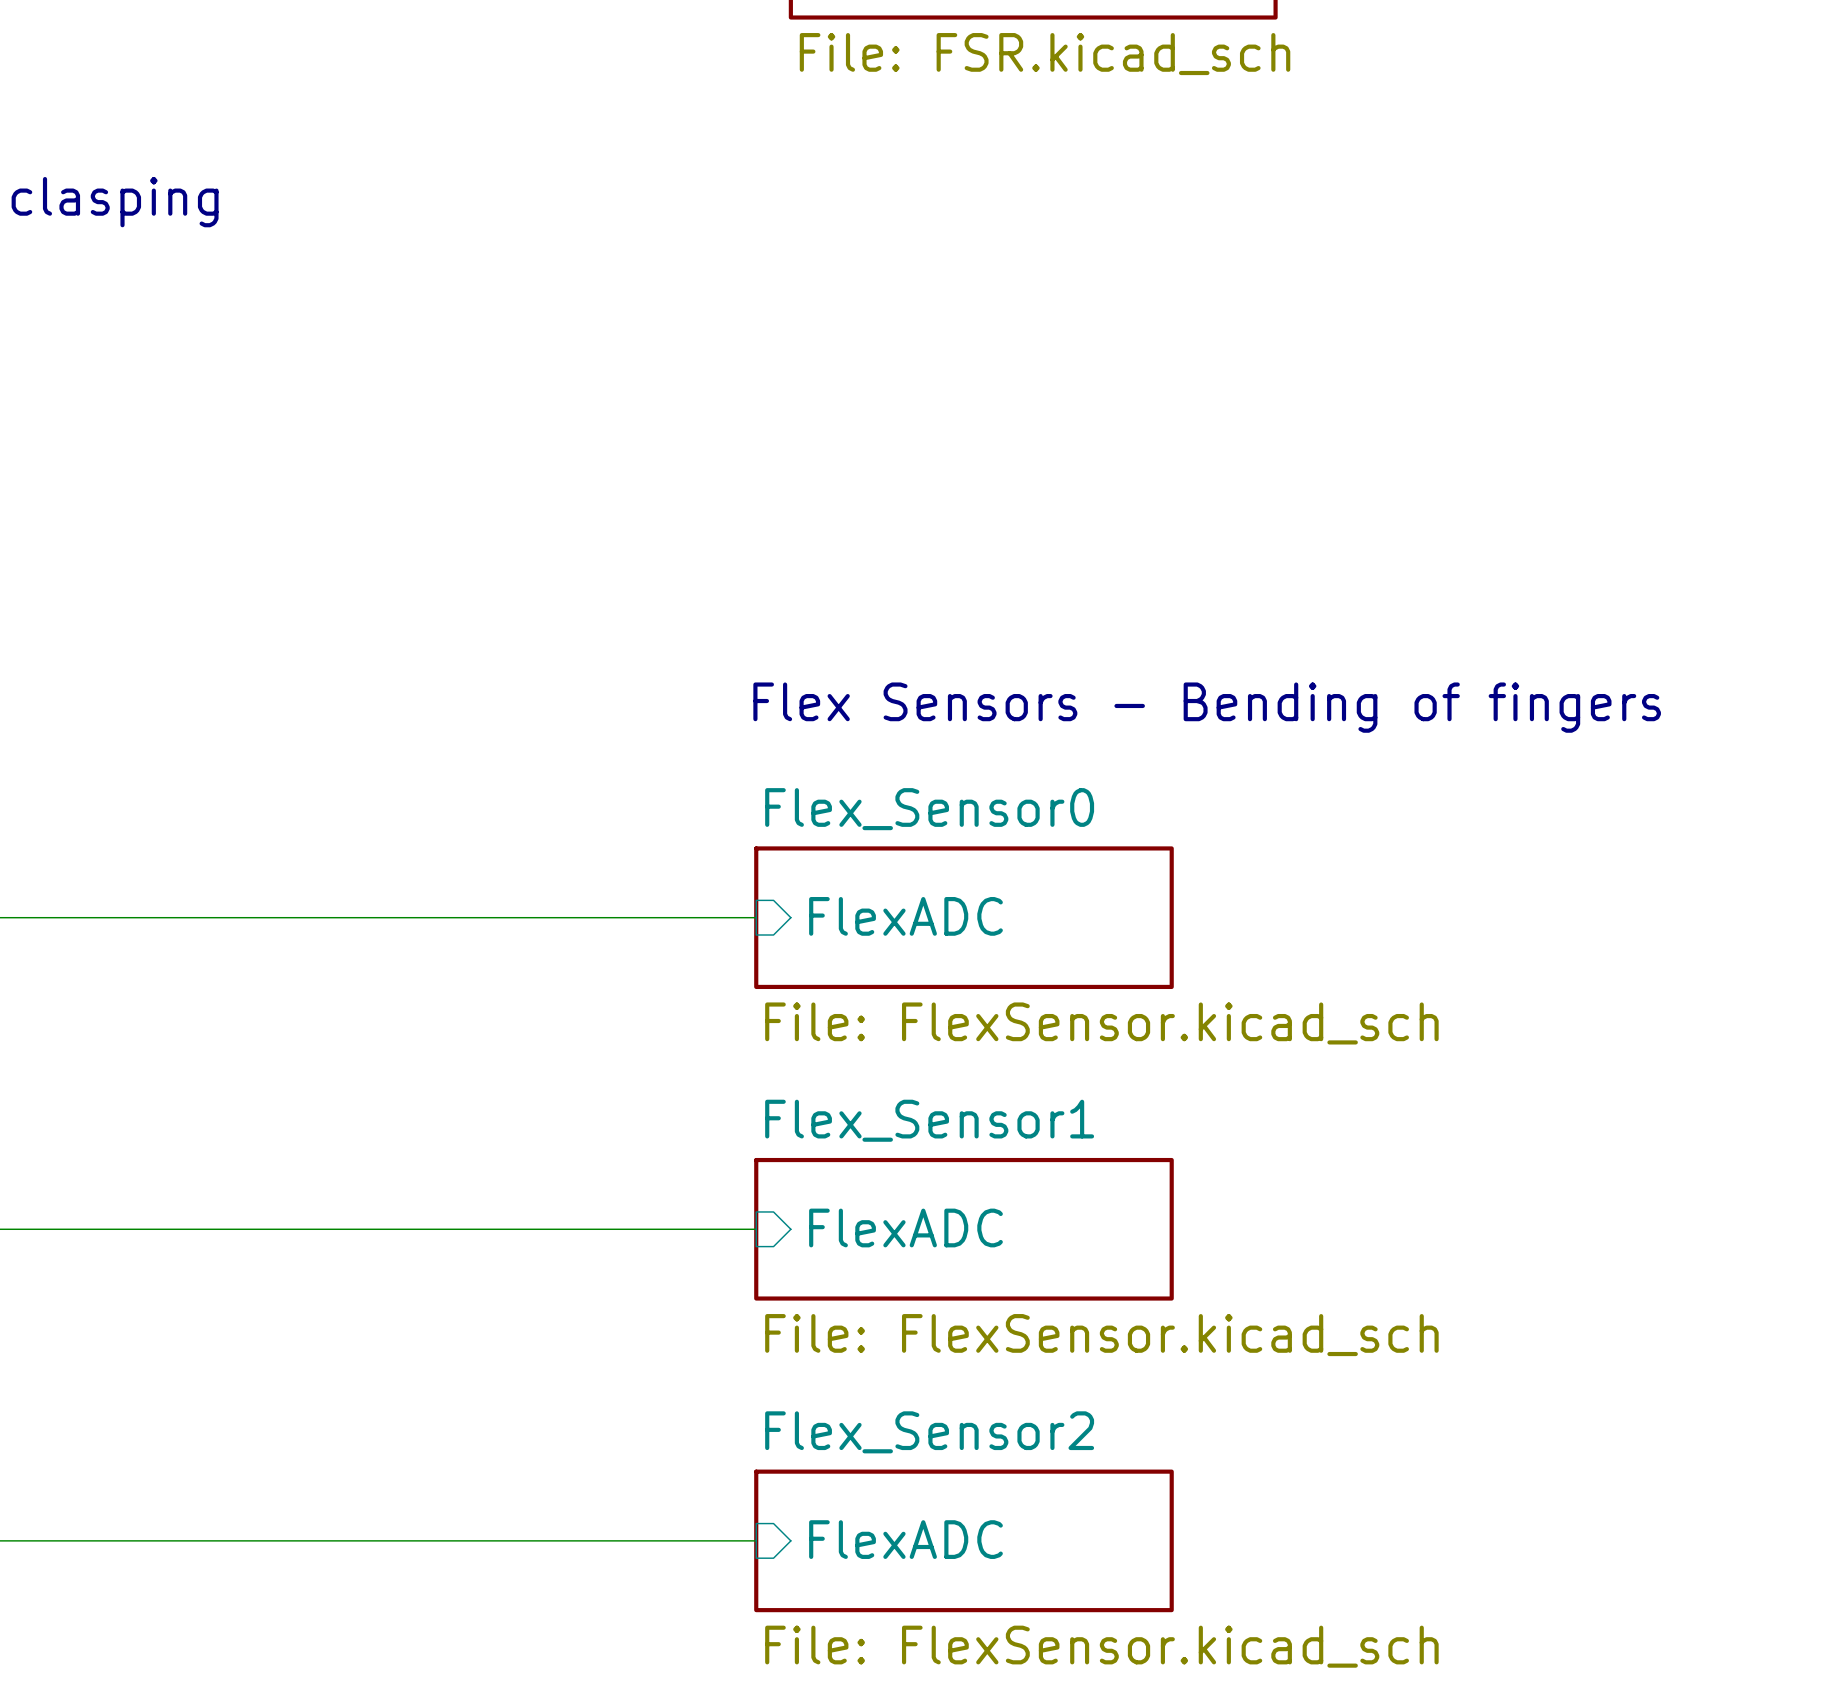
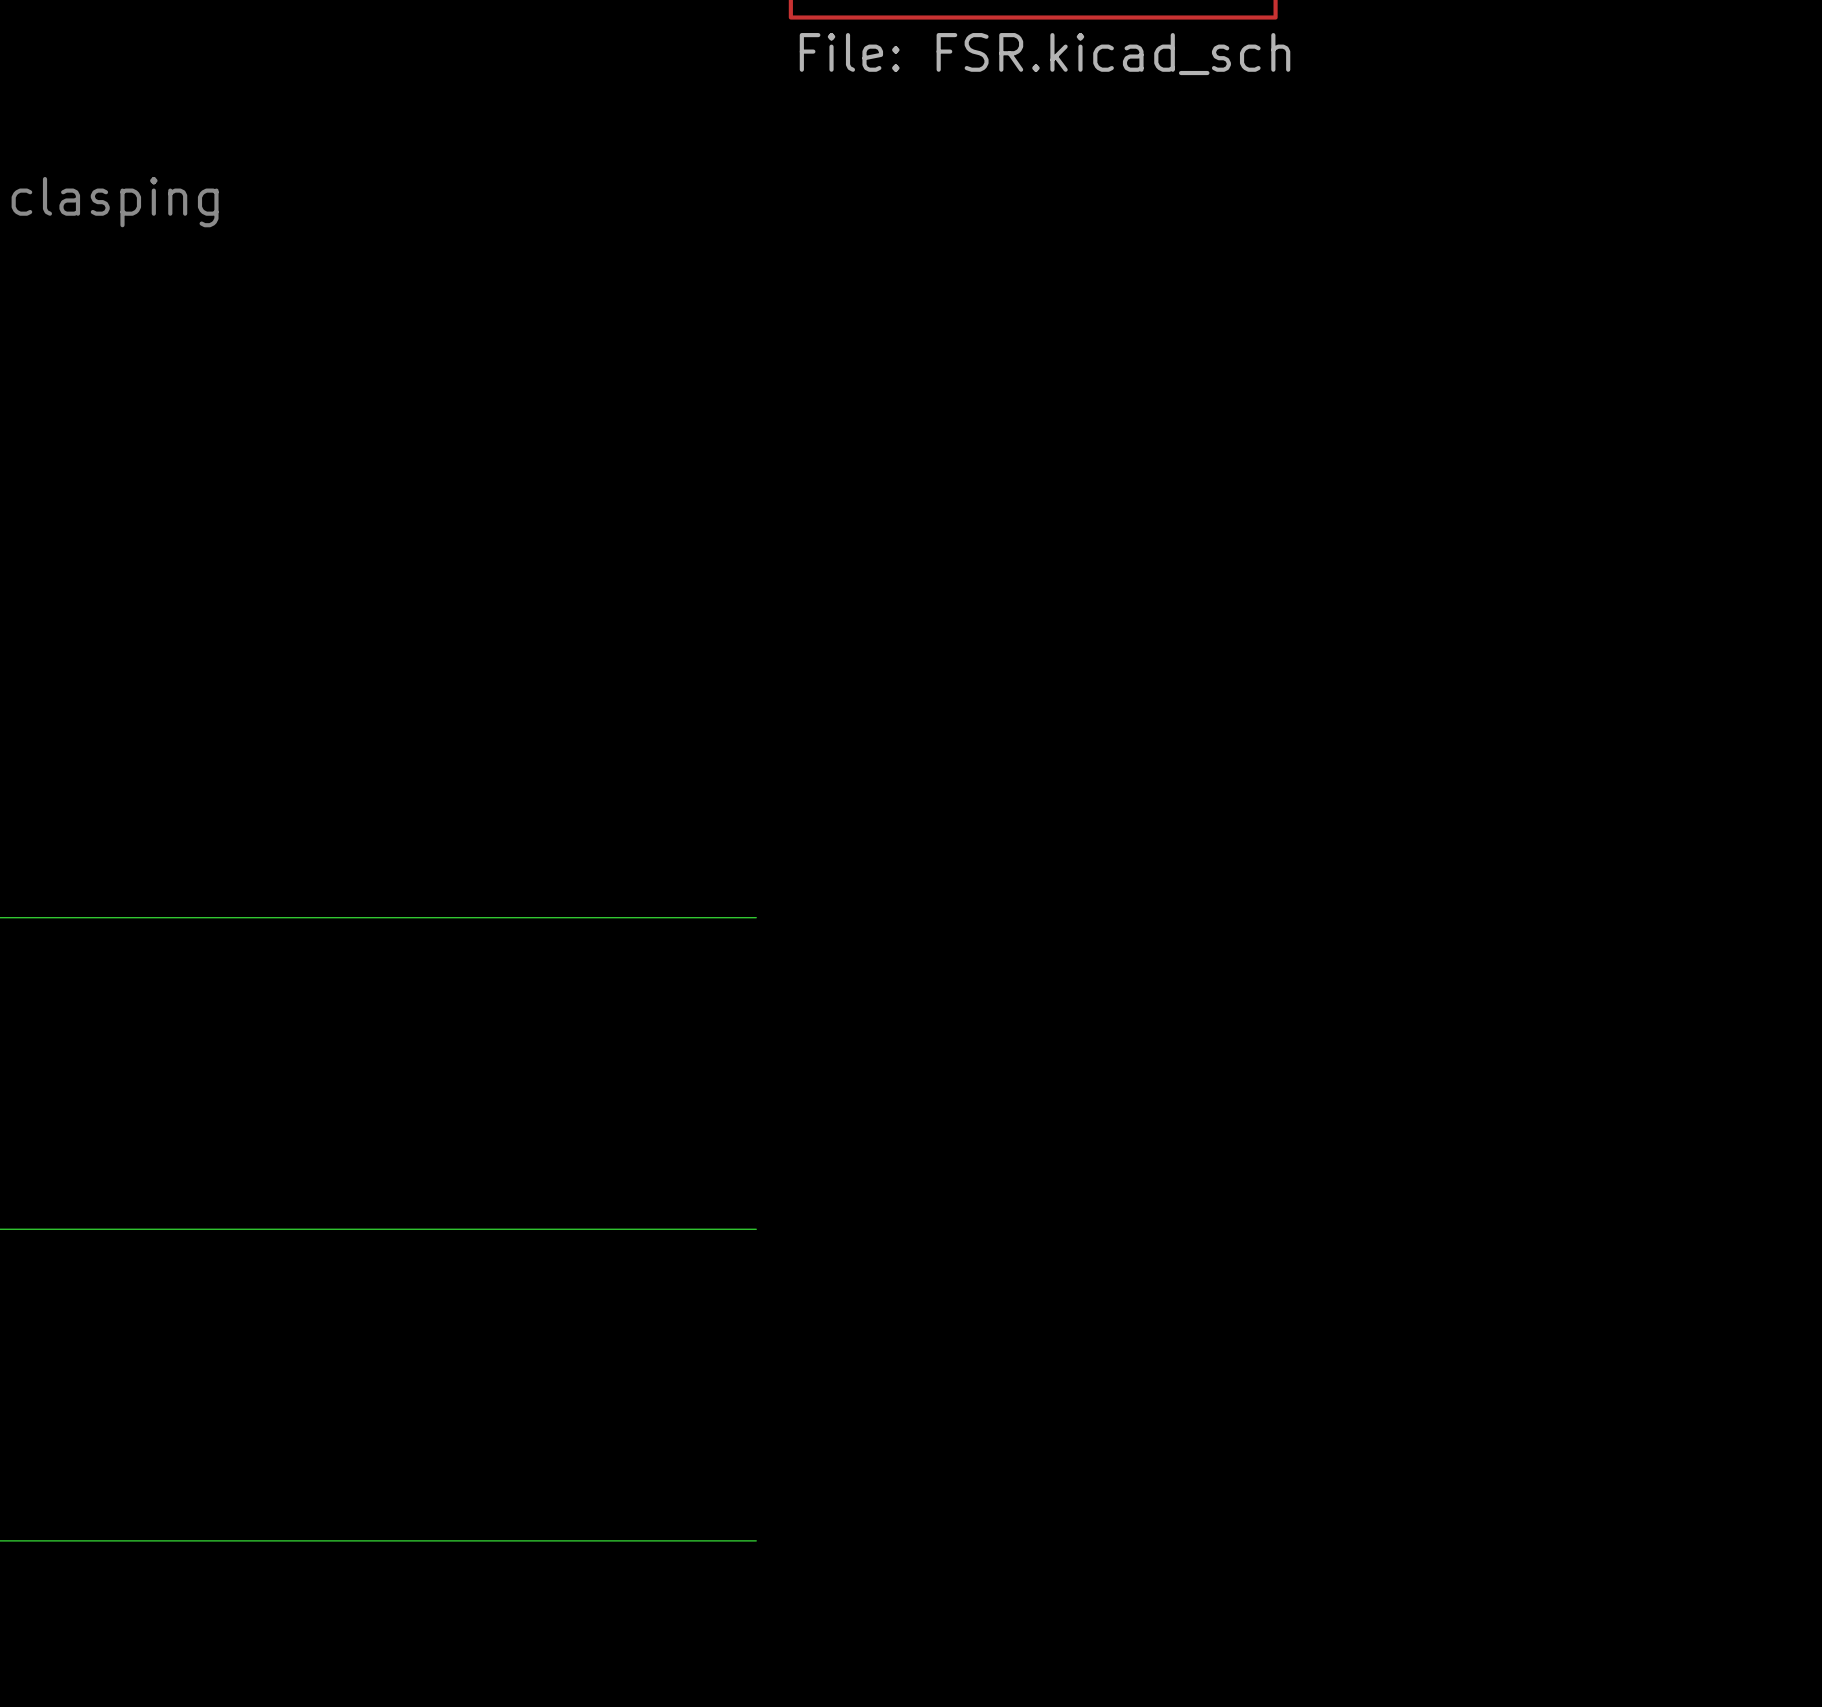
text: Flex Sensors - Bending of fingers (1207, 707) -> none
sheet pin: FlexADC (905, 916) -> none
sheet Flex_Sensor0: File: FlexSensor.kicad_sch (963, 917) -> none
sheet pin: FlexADC (905, 1227) -> none
sheet Flex_Sensor1: File: FlexSensor.kicad_sch (963, 1229) -> none
sheet pin: FlexADC (905, 1539) -> none
sheet Flex_Sensor2: File: FlexSensor.kicad_sch (963, 1540) -> none

